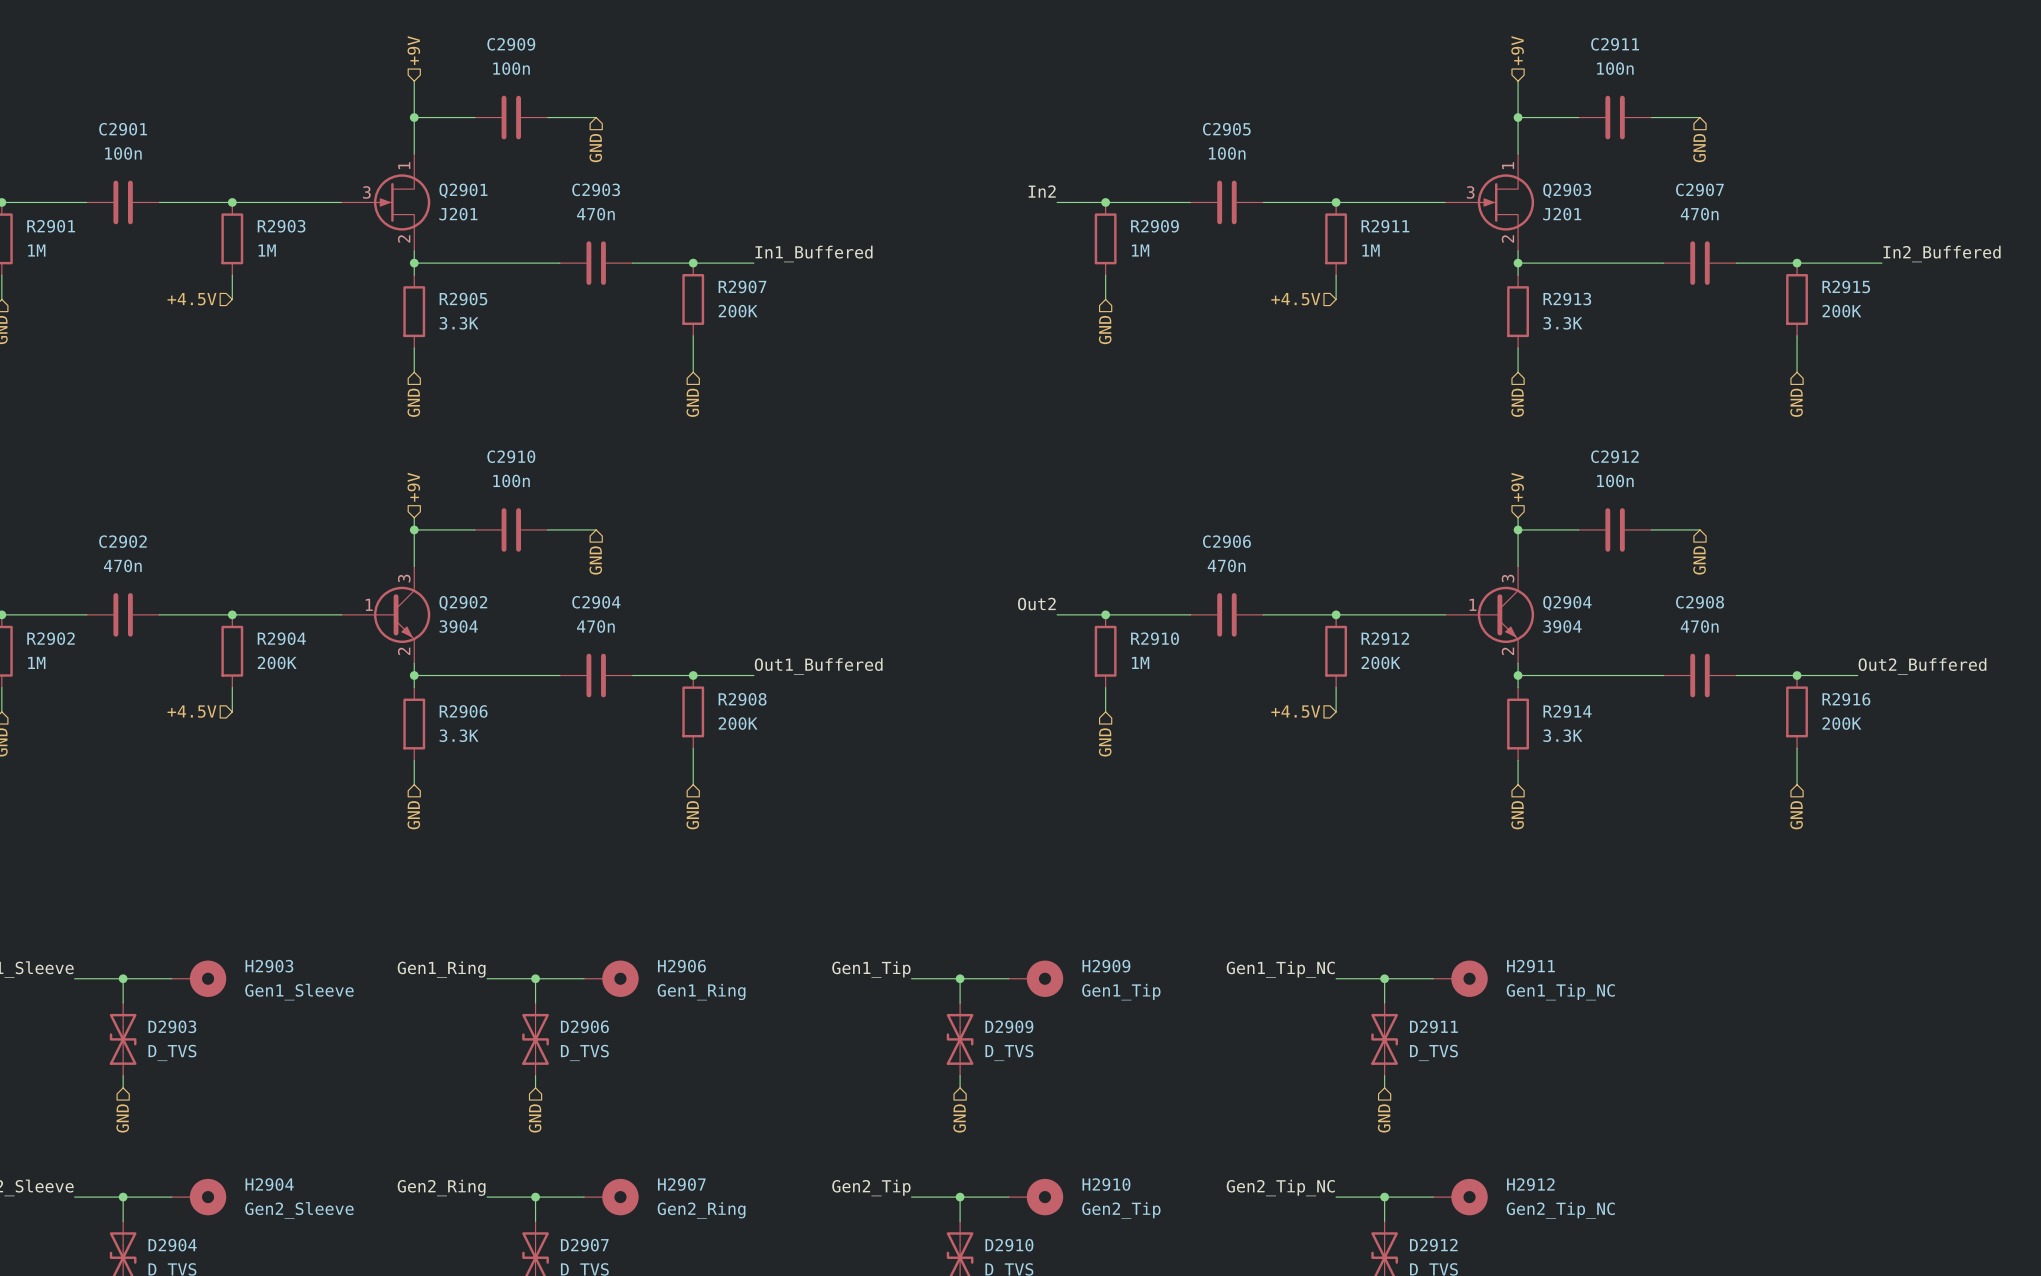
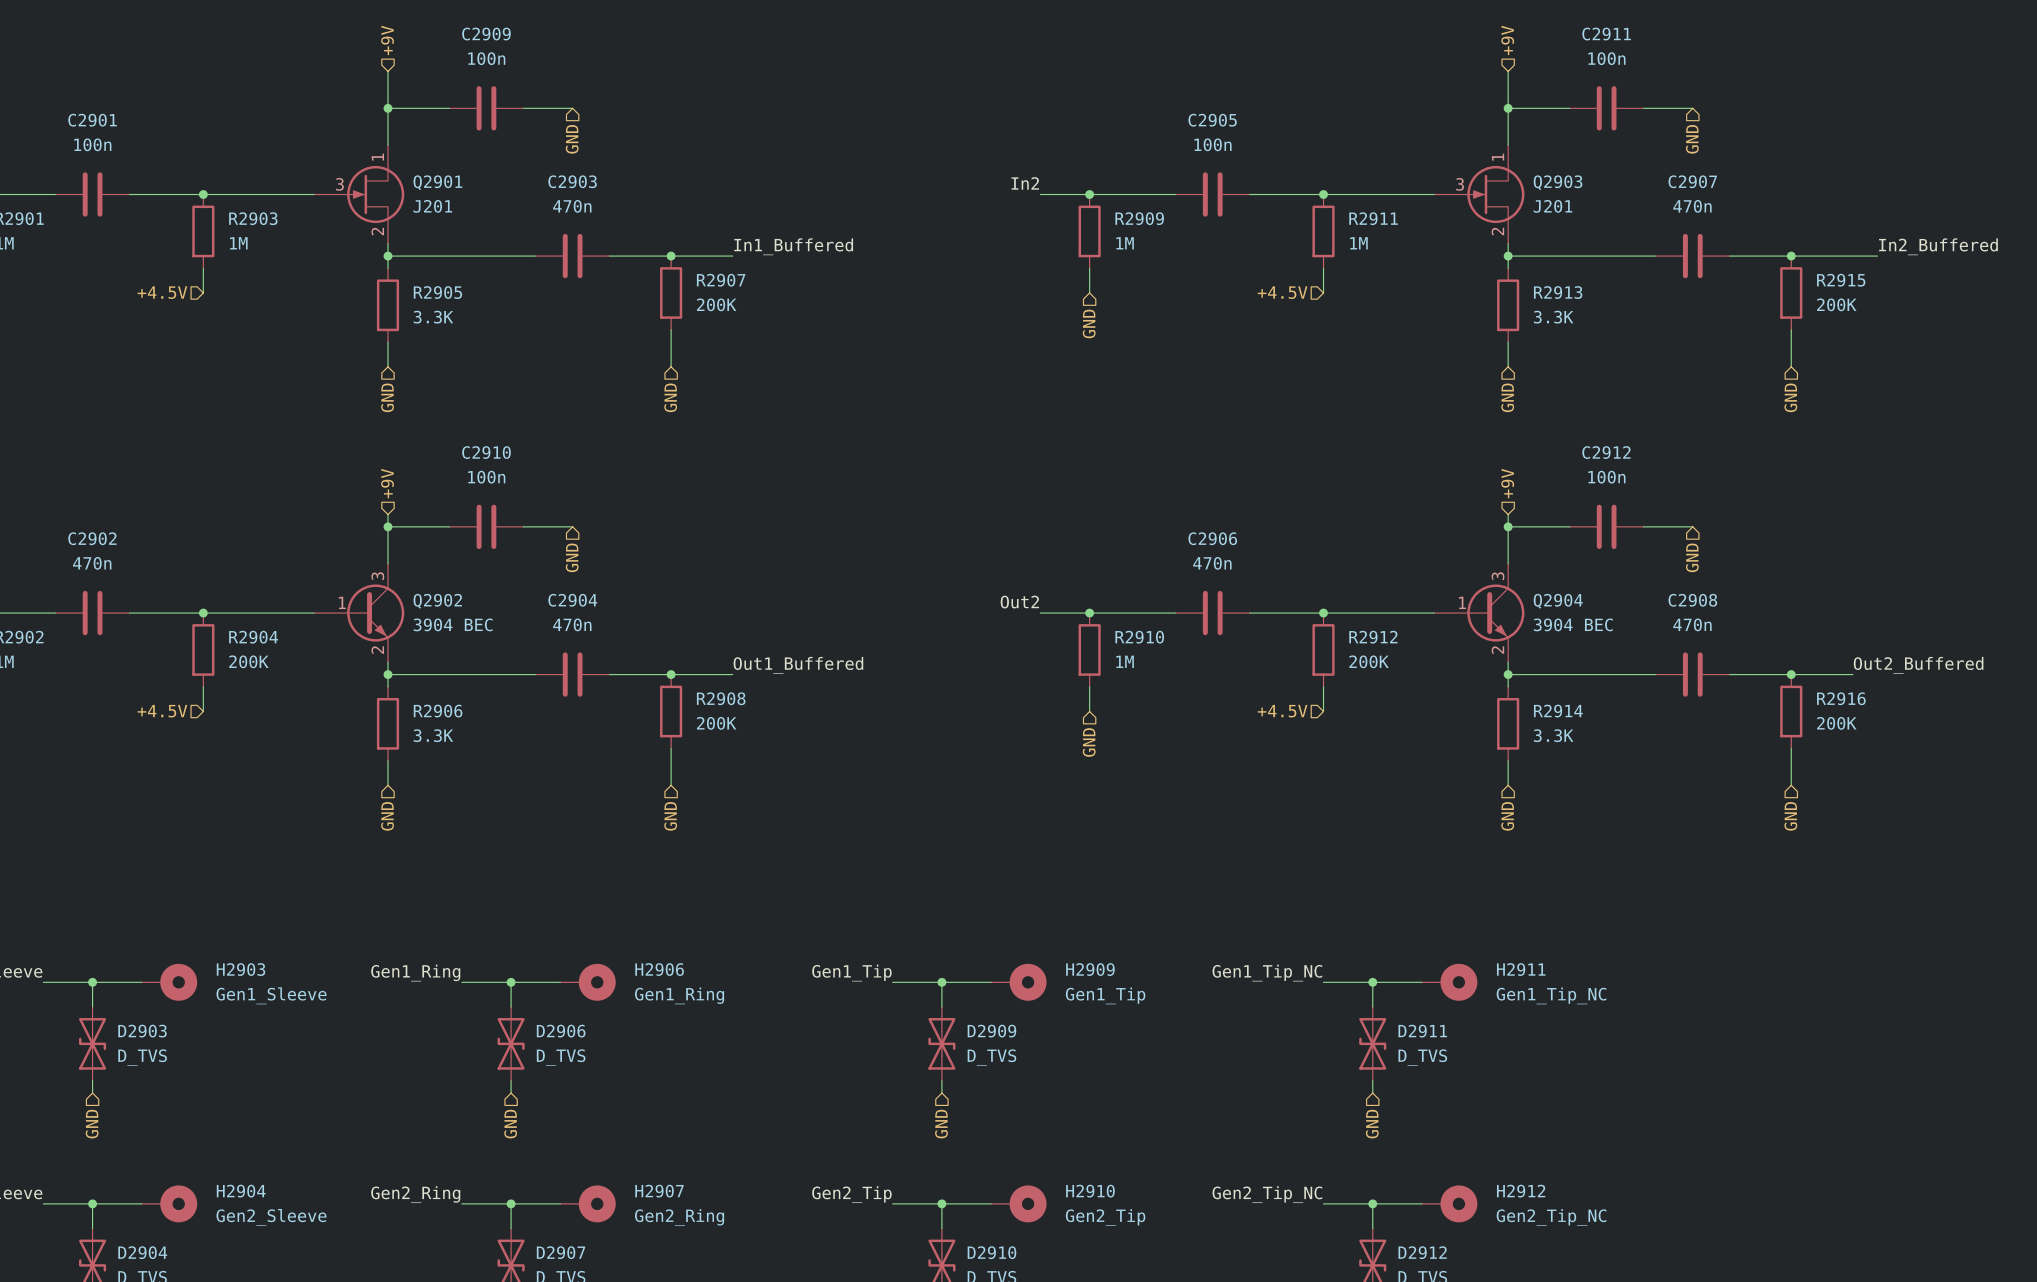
Q2902 value: 3904 (458, 626) -> 3904 BEC (453, 624)
Q2904 value: 3904 (1562, 626) -> 3904 BEC (1573, 624)

